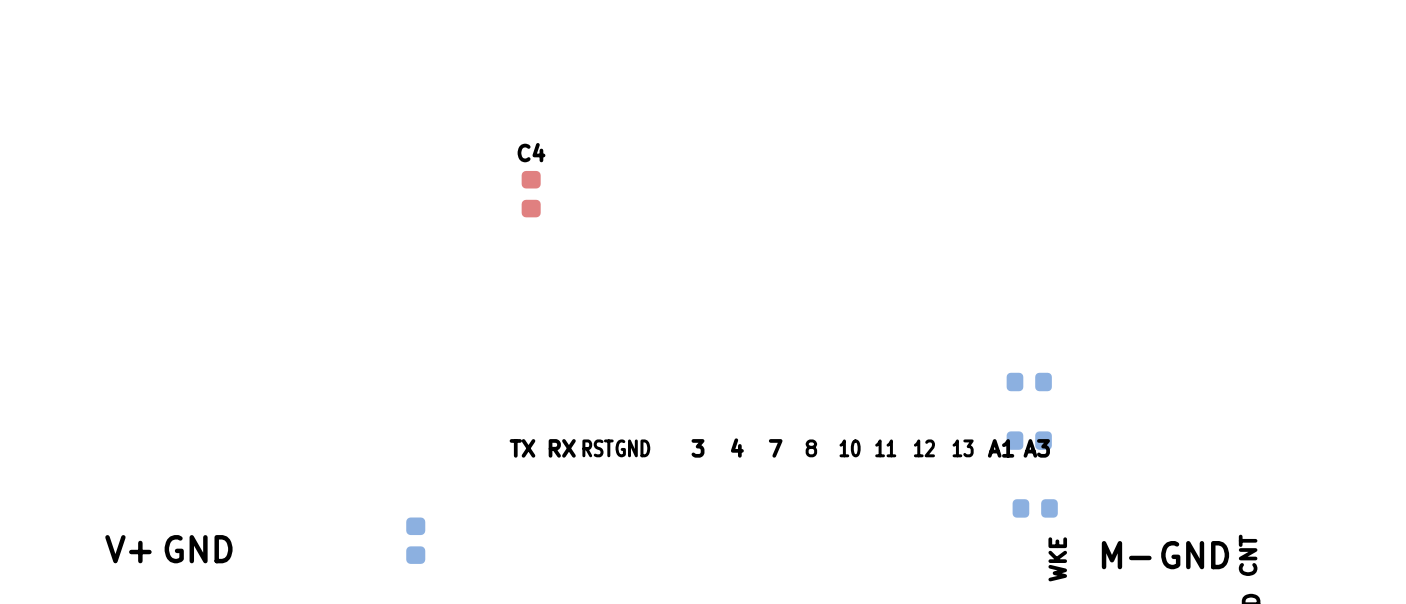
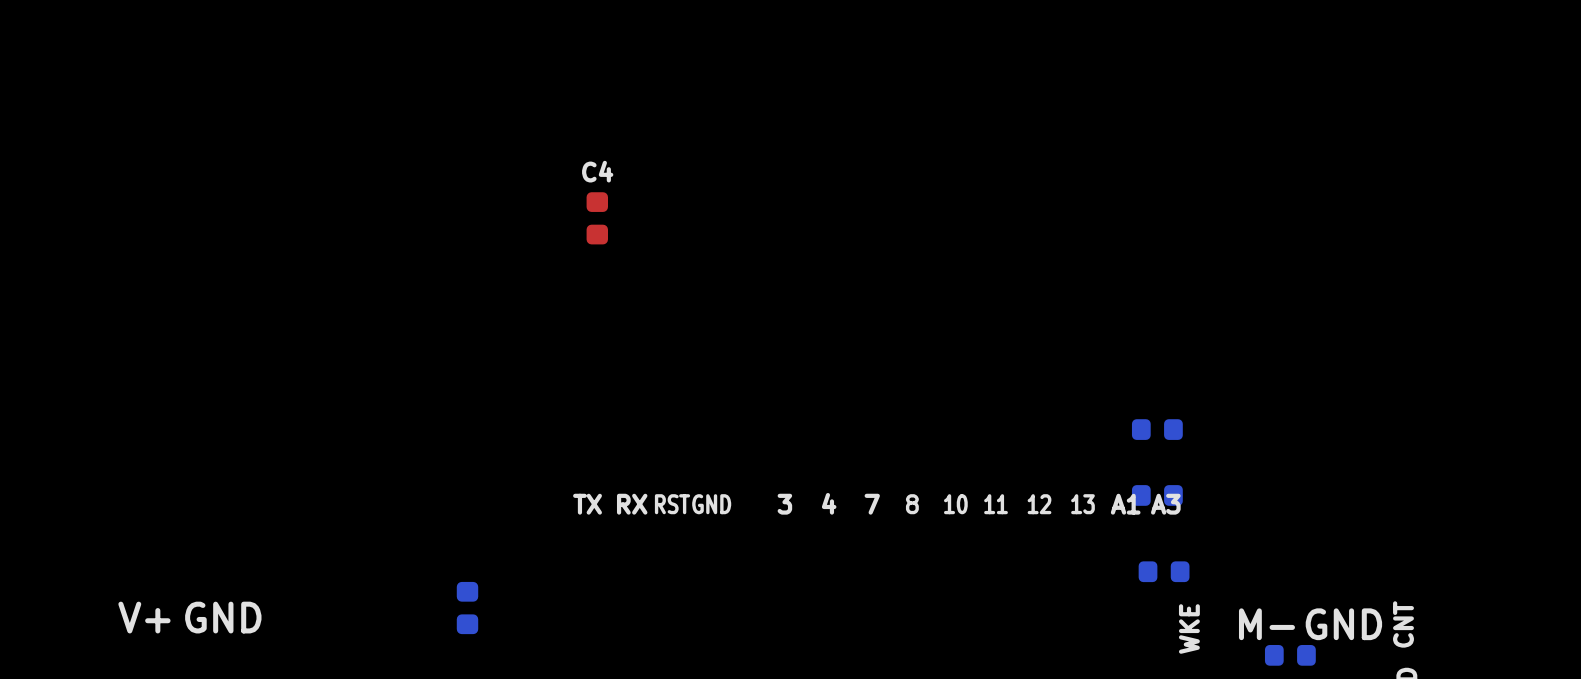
part: none -> (1290, 655)

